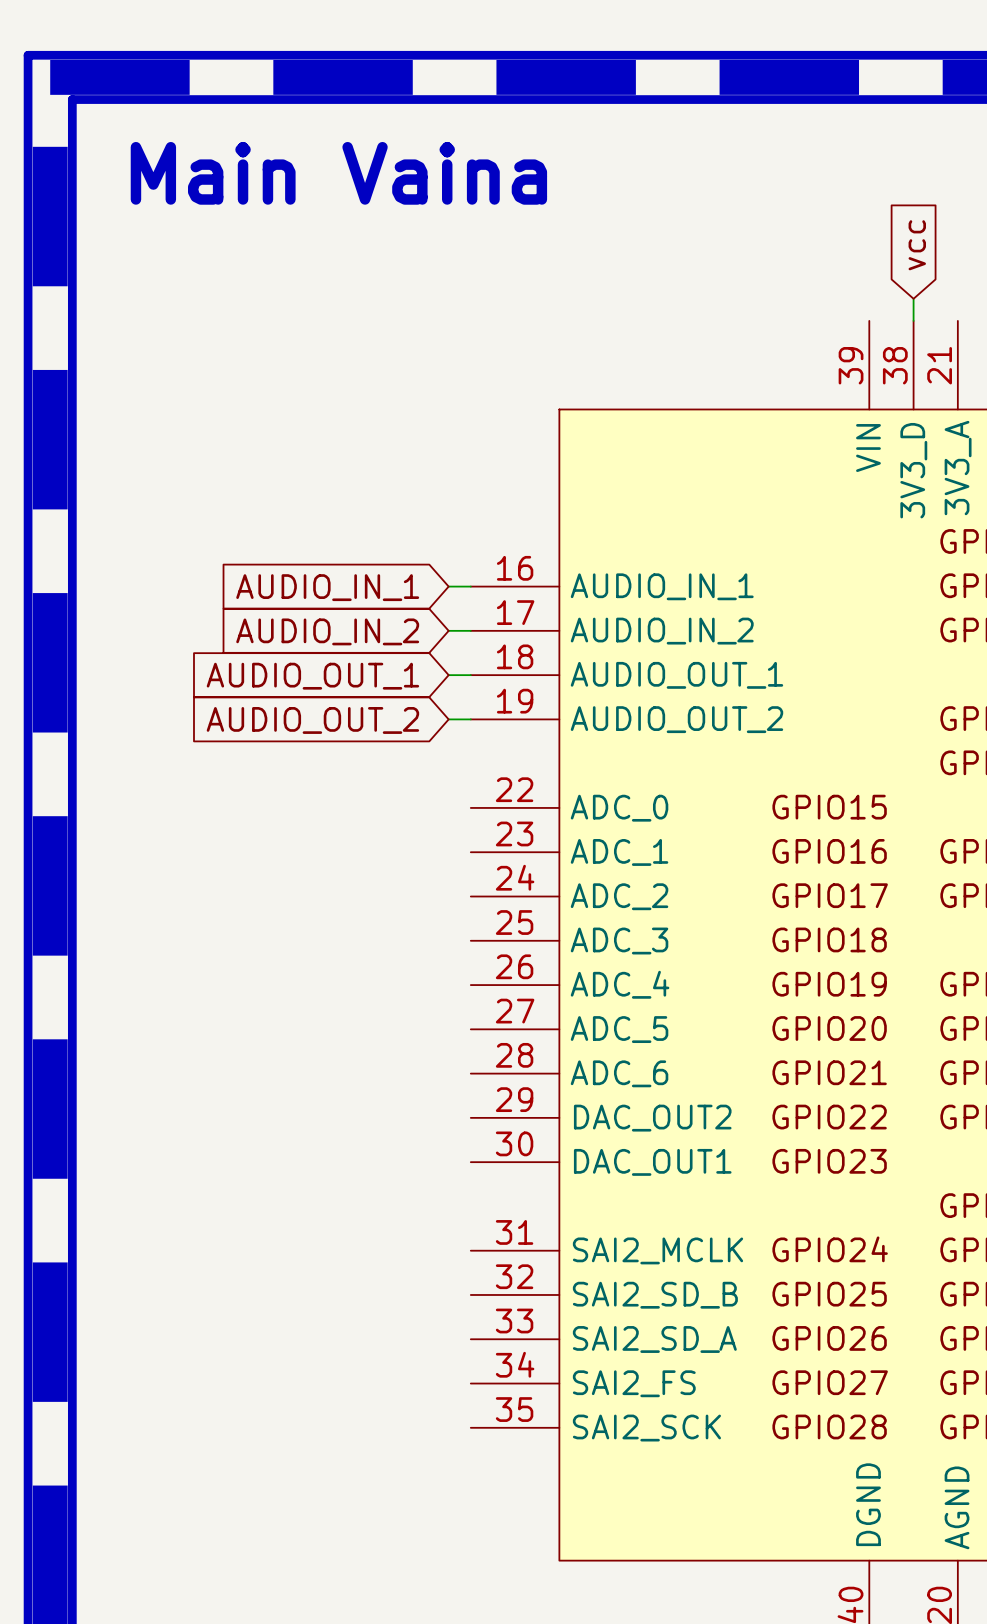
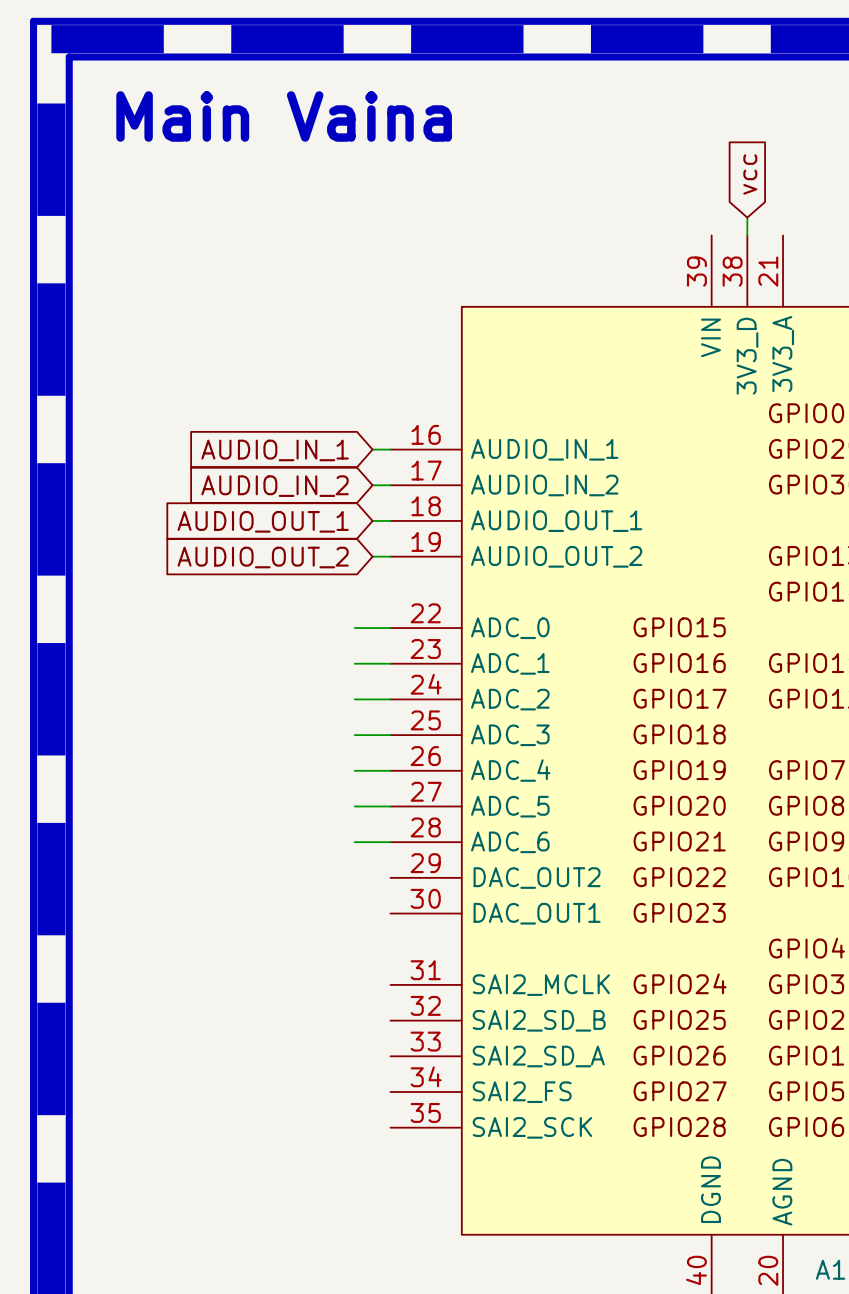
wire: none -> (354, 628) (390, 628)
wire: none -> (354, 663) (390, 663)
wire: none -> (354, 699) (390, 699)
wire: none -> (354, 735) (390, 735)
wire: none -> (354, 770) (390, 770)
wire: none -> (354, 806) (390, 806)
wire: none -> (354, 842) (390, 842)

